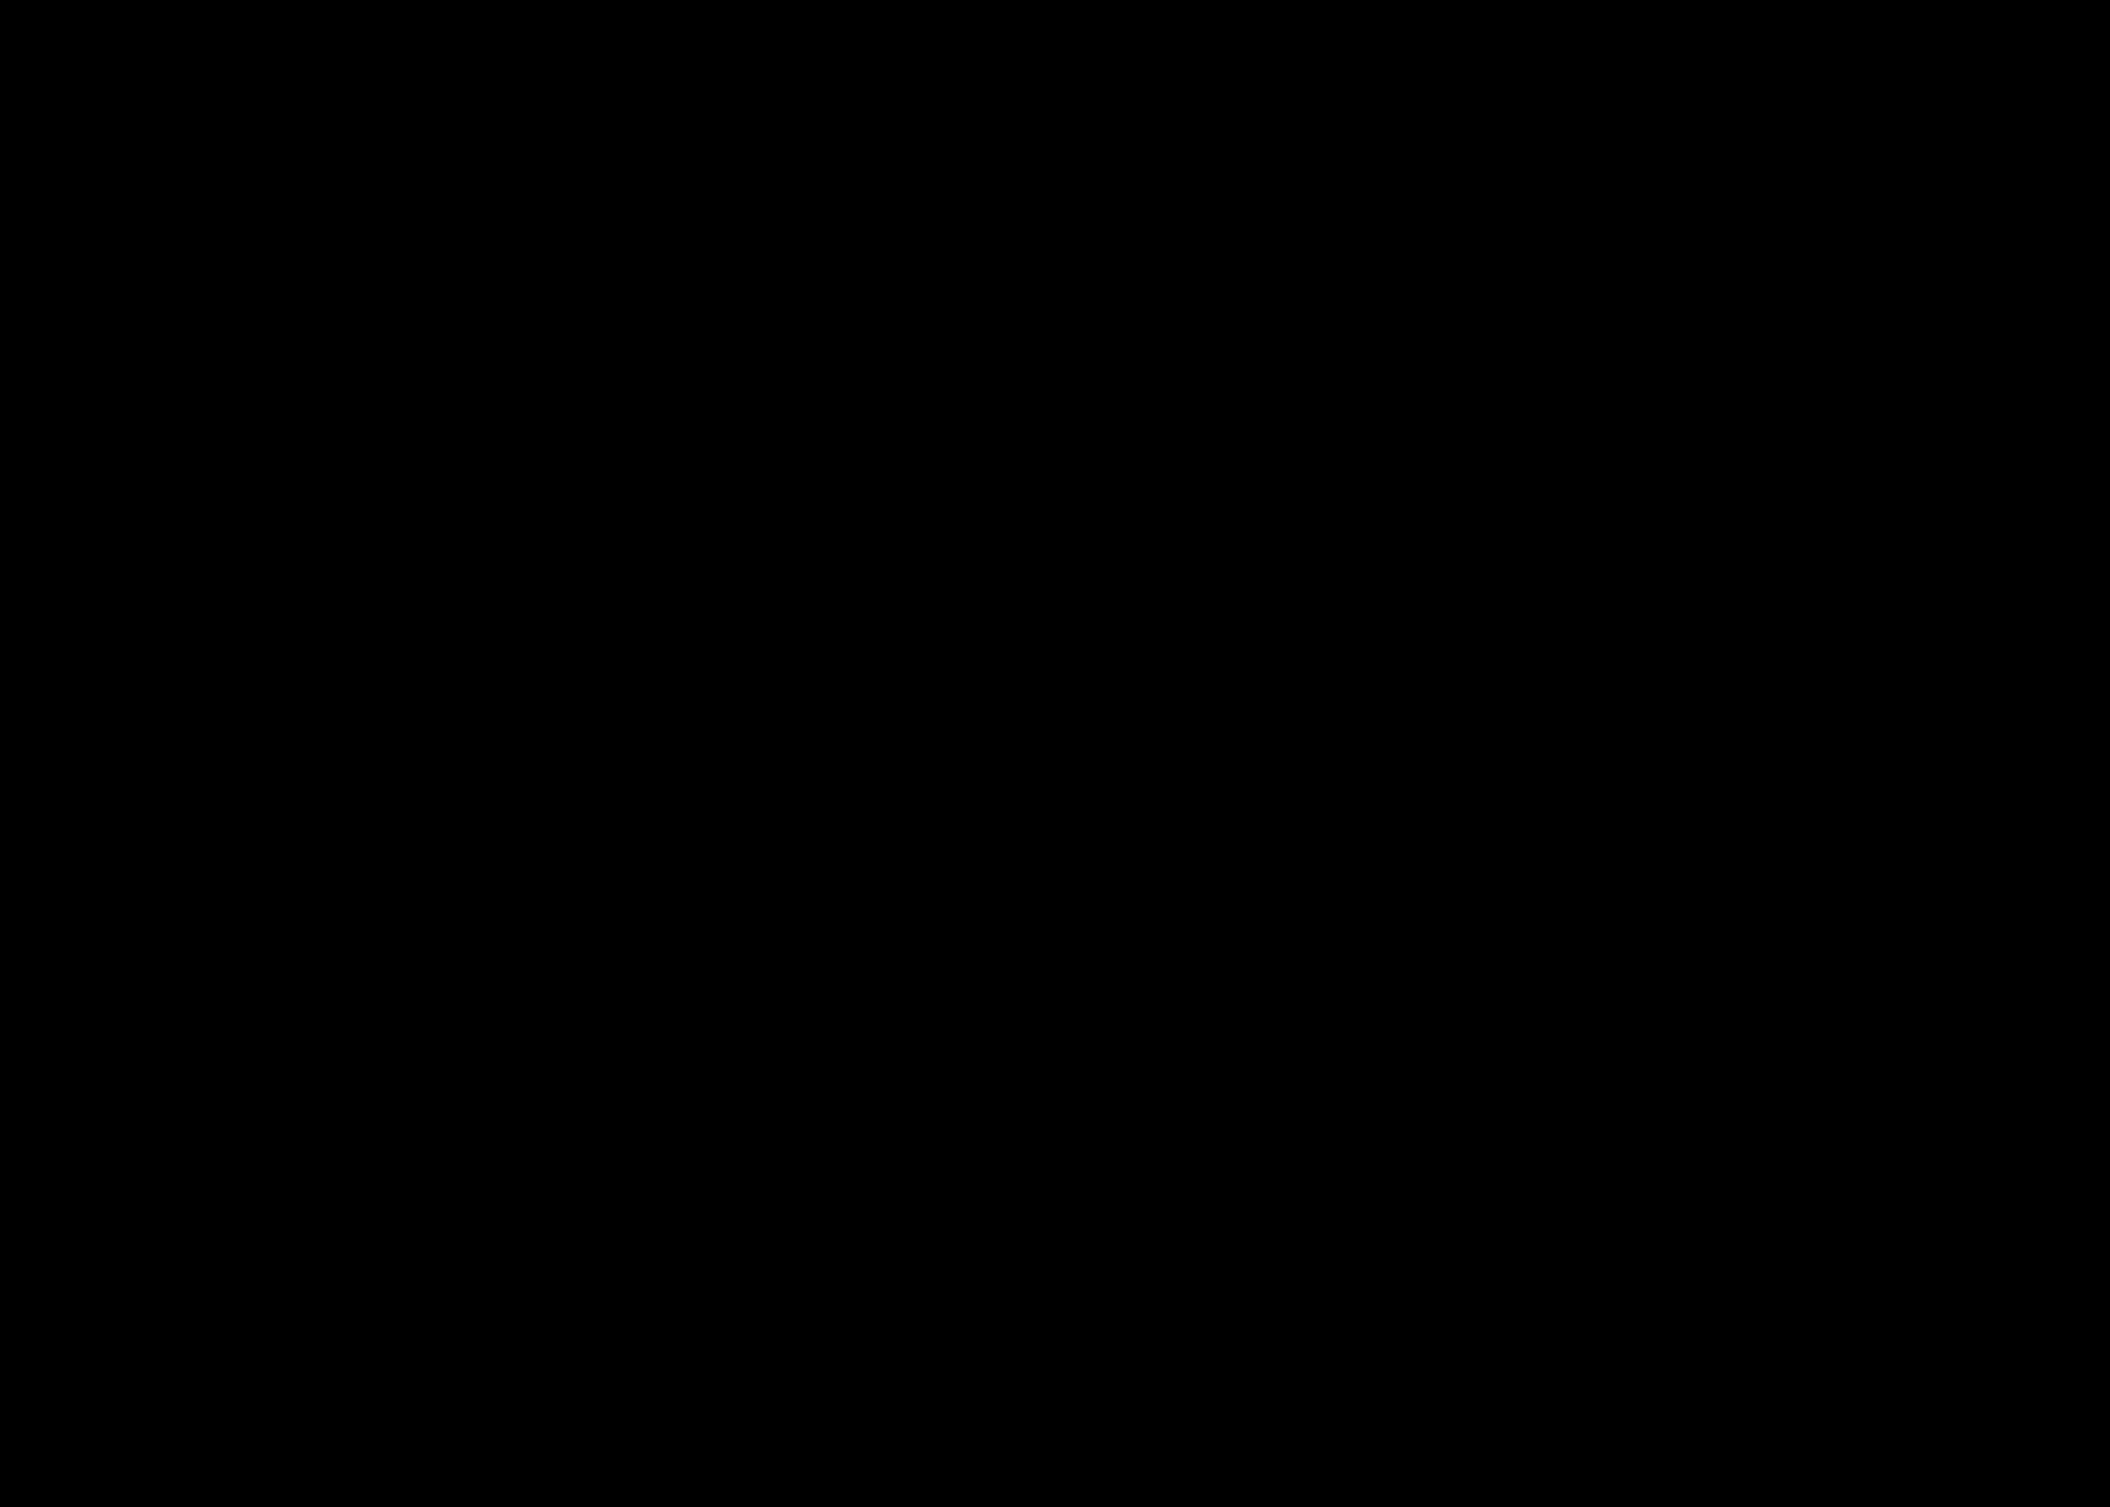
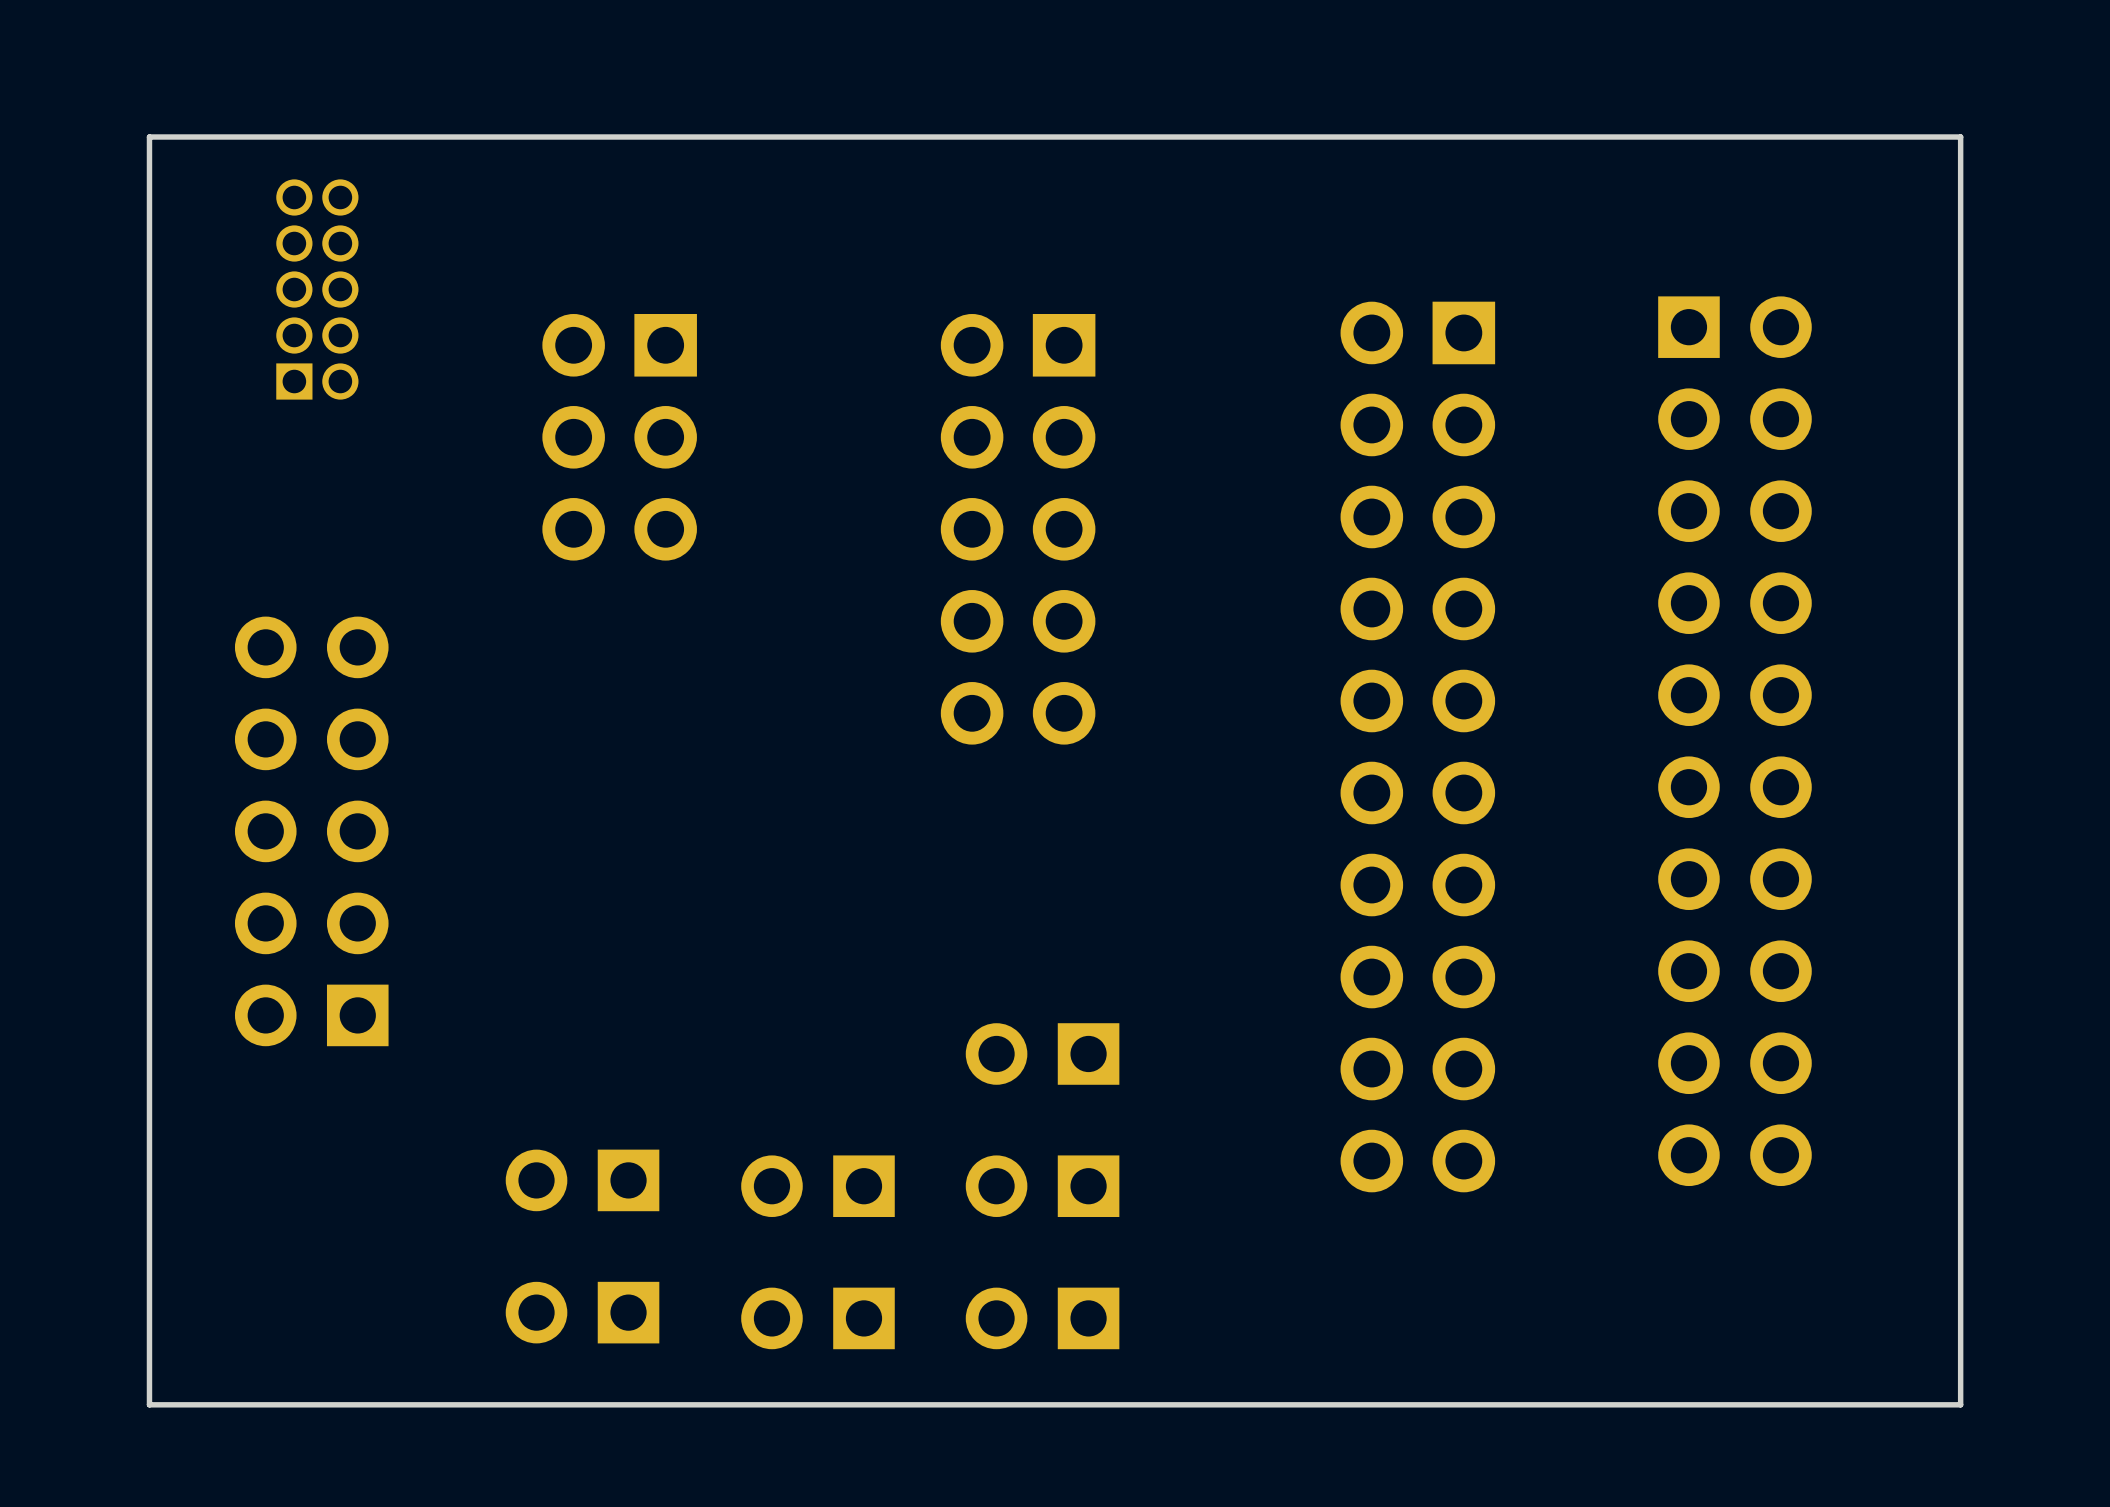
board edge: none -> (1960, 137) (1960, 1404) (149, 1404) (149, 137) (1960, 137)
part: none -> (317, 289)
part: none -> (619, 437)
part: none -> (1018, 529)
part: none -> (1734, 741)
part: none -> (1417, 747)
part: none -> (311, 831)
part: none -> (1042, 1053)
part: none -> (582, 1180)
part: none -> (817, 1186)
part: none -> (1042, 1186)
part: none -> (582, 1312)
part: none -> (817, 1318)
part: none -> (1042, 1318)

